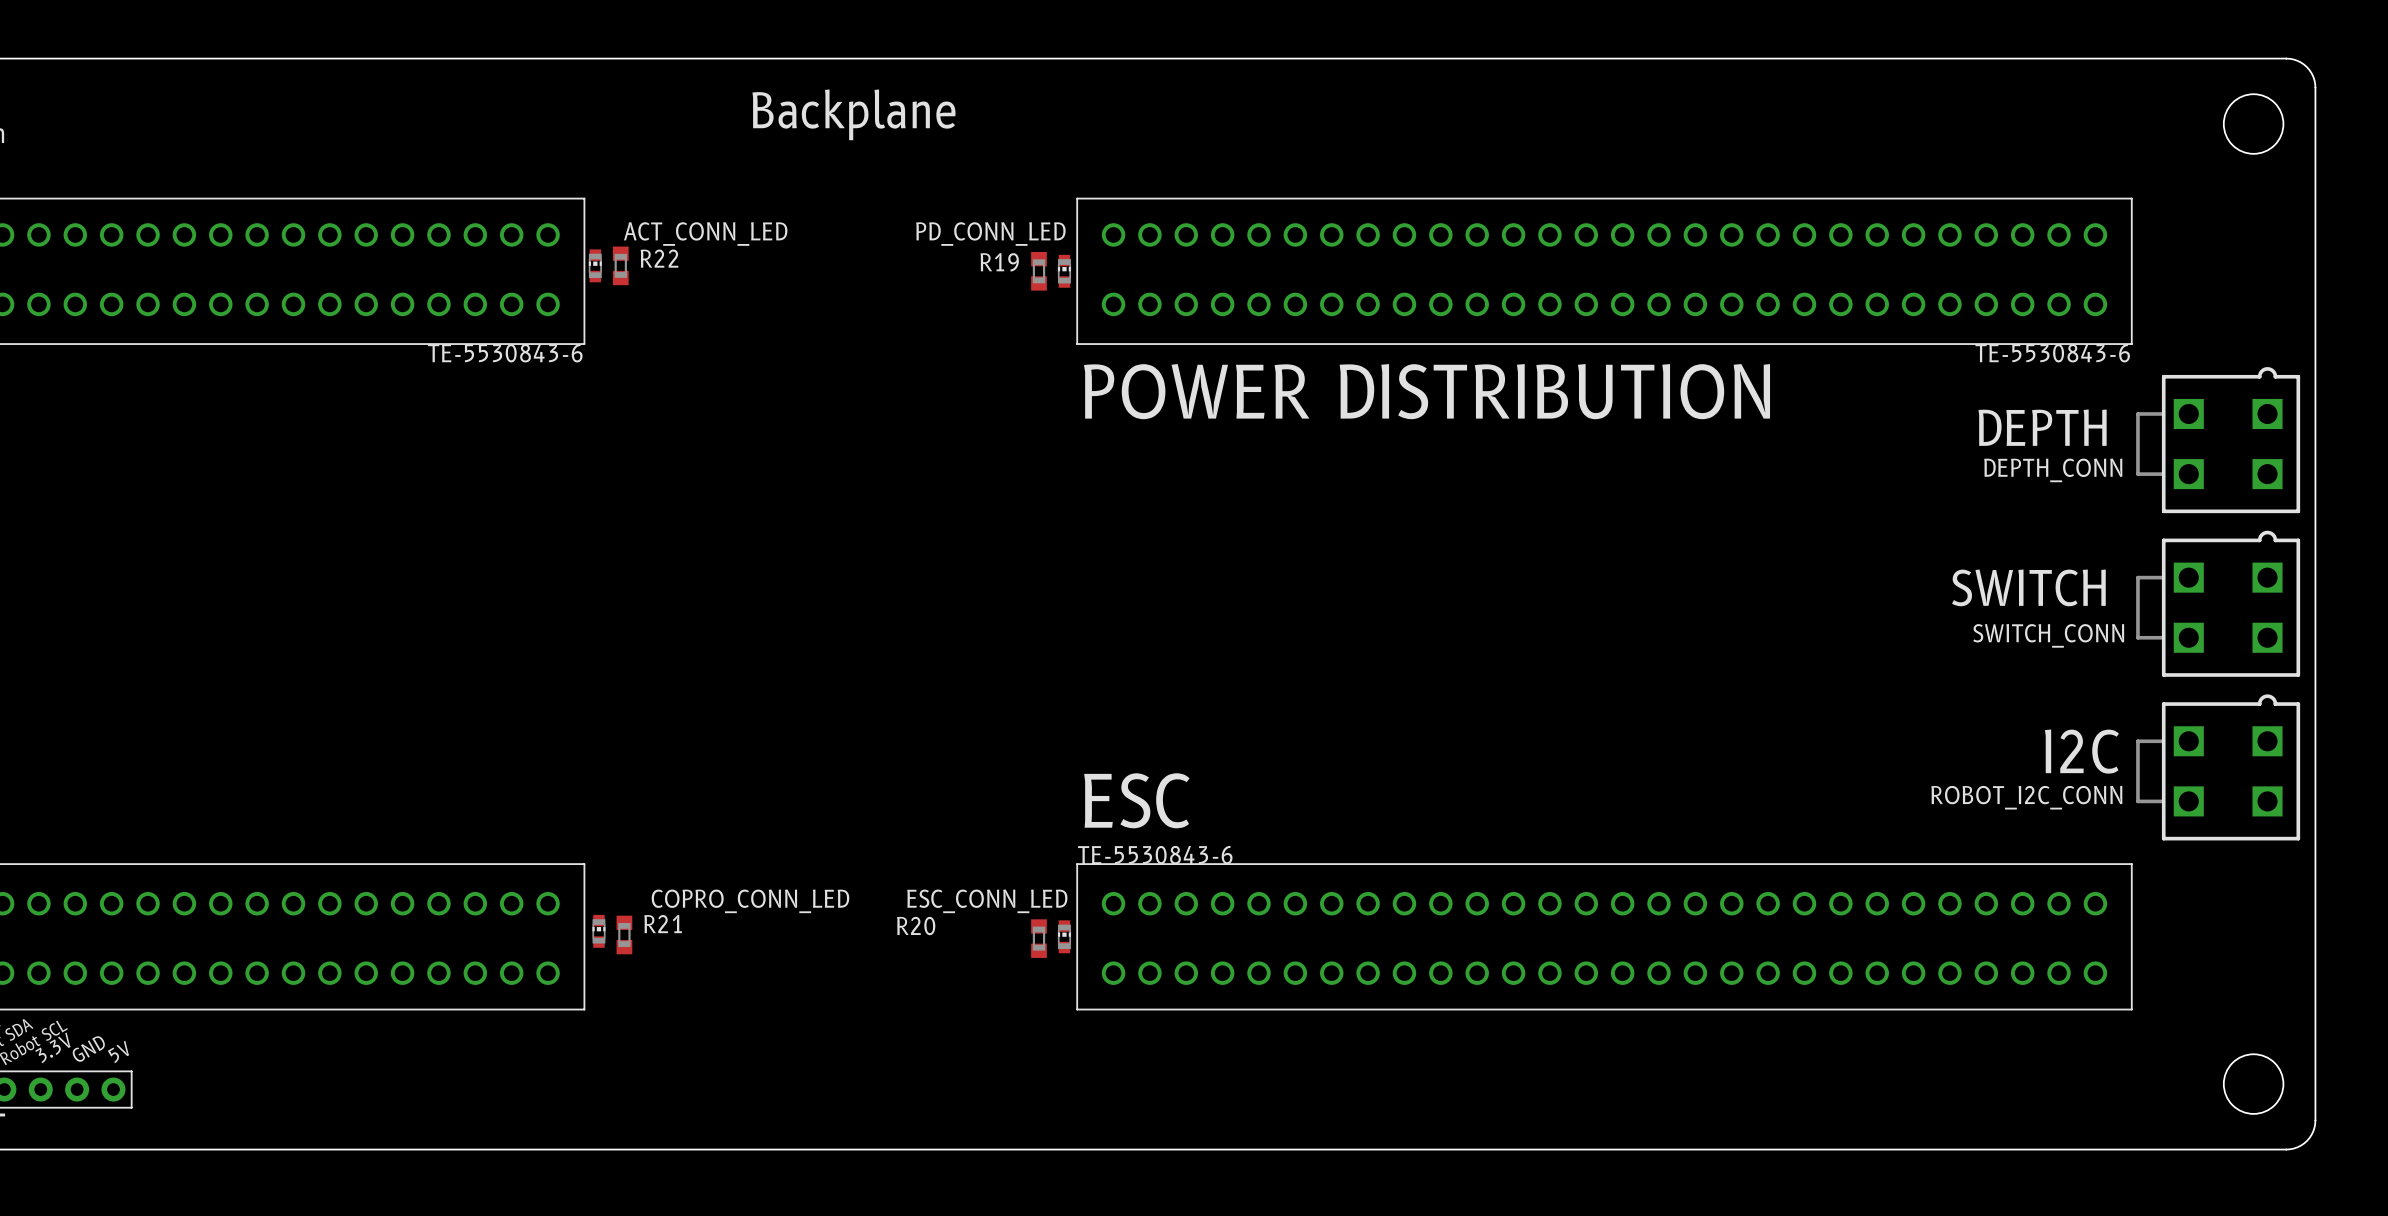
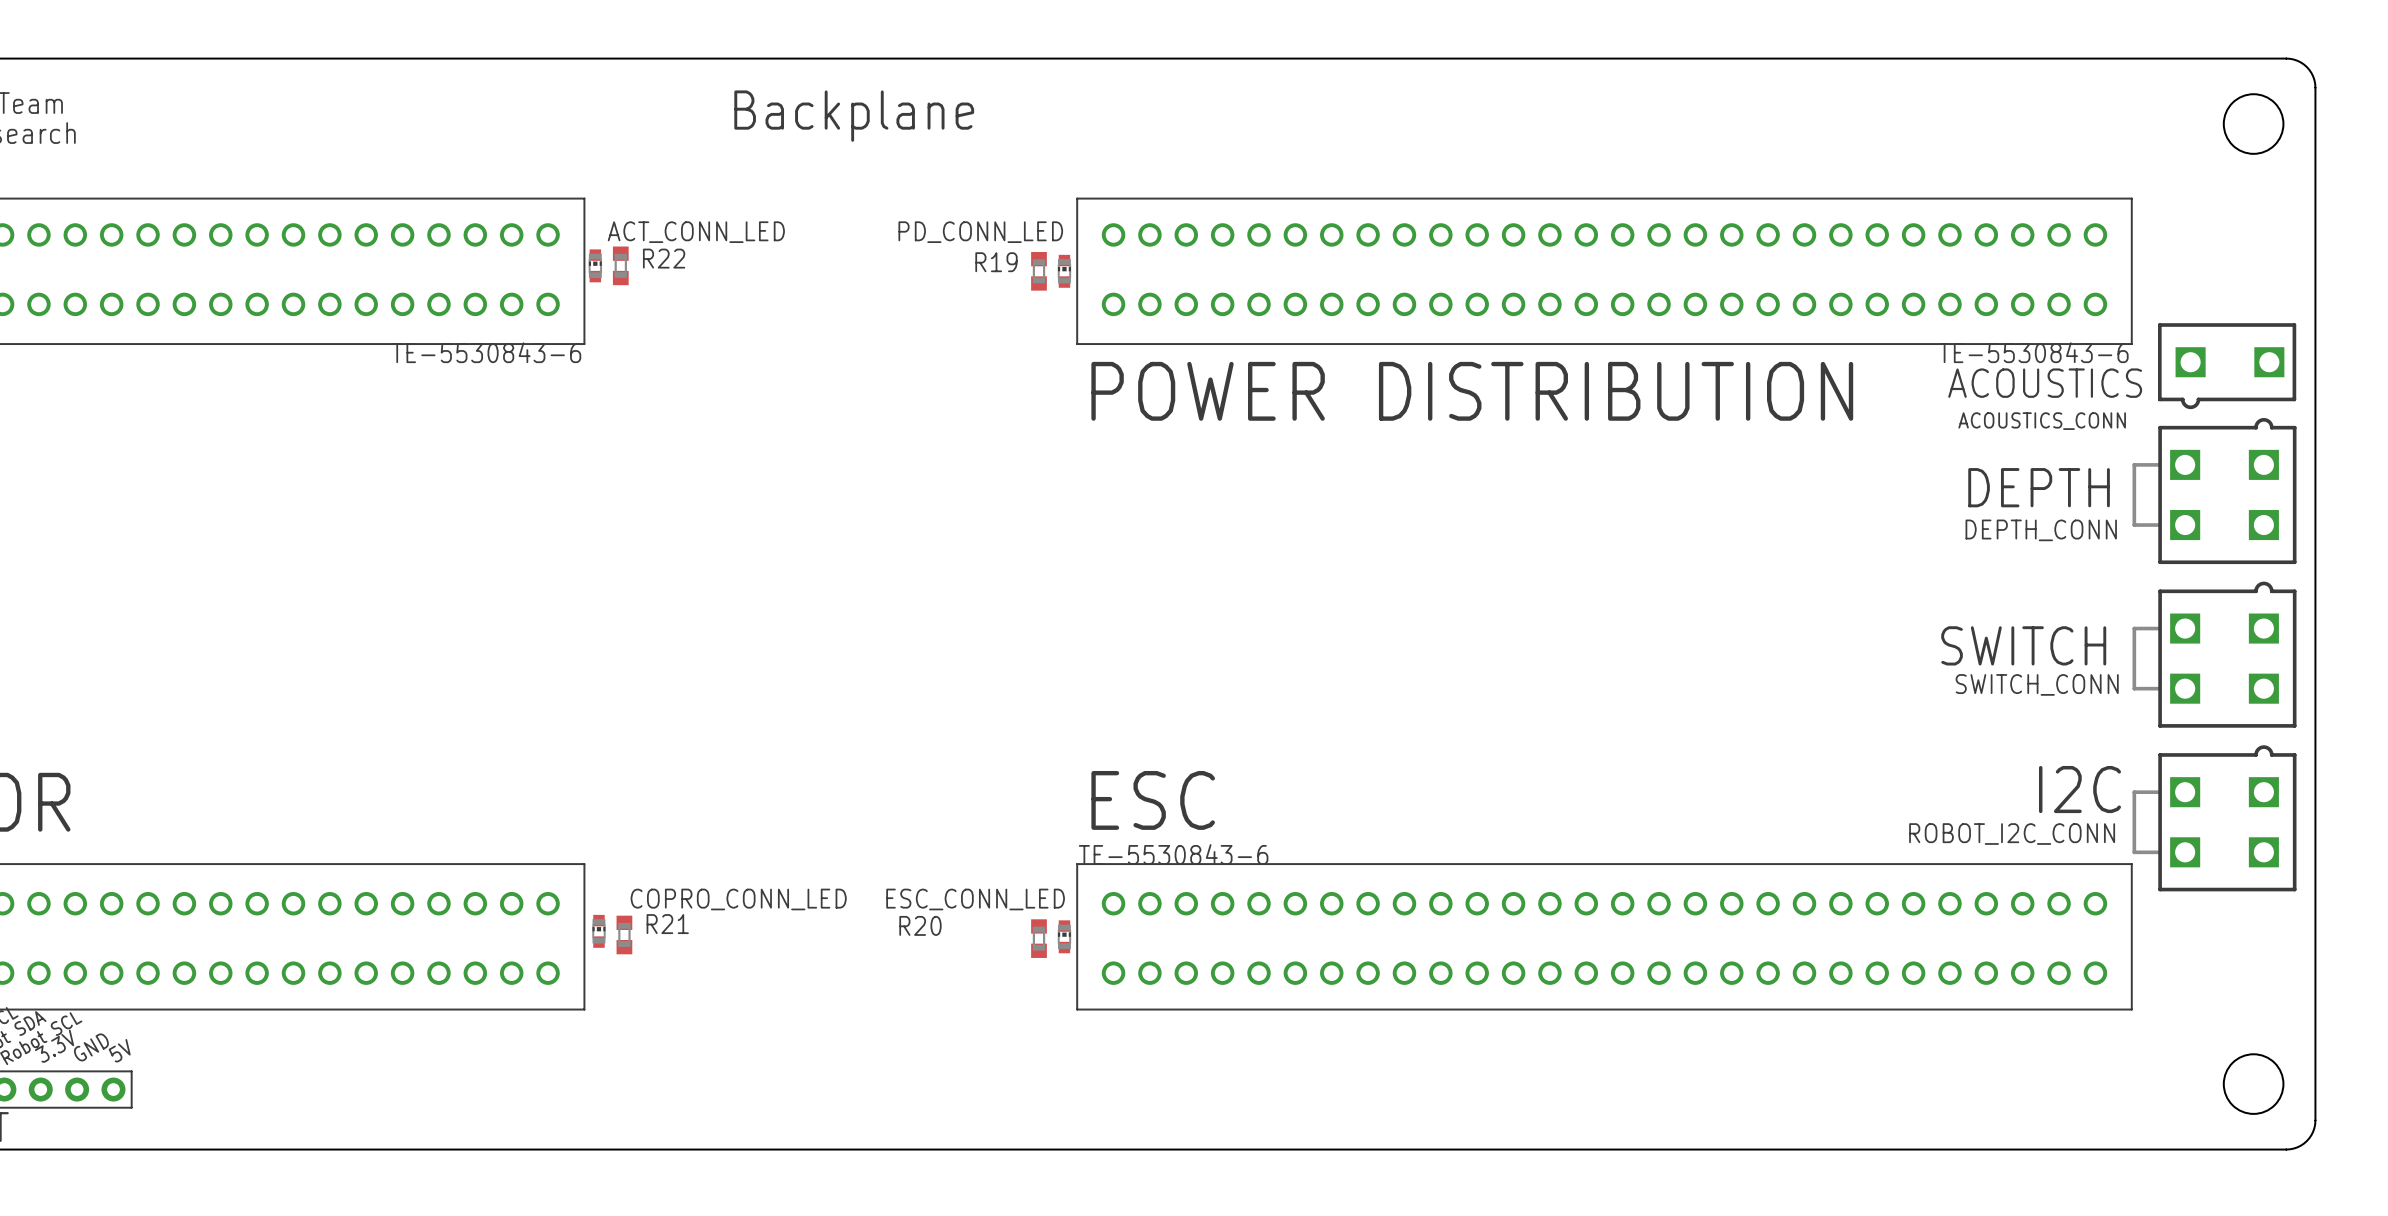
ACOUSTICS_CONN: none -> (2227, 366)
text: none -> ACOUSTICS (2045, 383)
text position: DEPTH (2042, 427) -> DEPTH (2039, 487)
DEPTH_CONN position: (2218, 440) -> (2214, 491)
DEPTH_CONN name position: DEPTH_CONN (2053, 470) -> DEPTH_CONN (2041, 530)
text position: SWITCH (2028, 587) -> SWITCH (2023, 645)
SWITCH_CONN position: (2218, 603) -> (2214, 654)
text position: I2C (2081, 751) -> I2C (2079, 789)
ROBOT_I2C_CONN position: (2218, 767) -> (2214, 818)
ROBOT_I2C_CONN name position: ROBOT_I2C_CONN (2026, 797) -> ROBOT_I2C_CONN (2012, 834)

